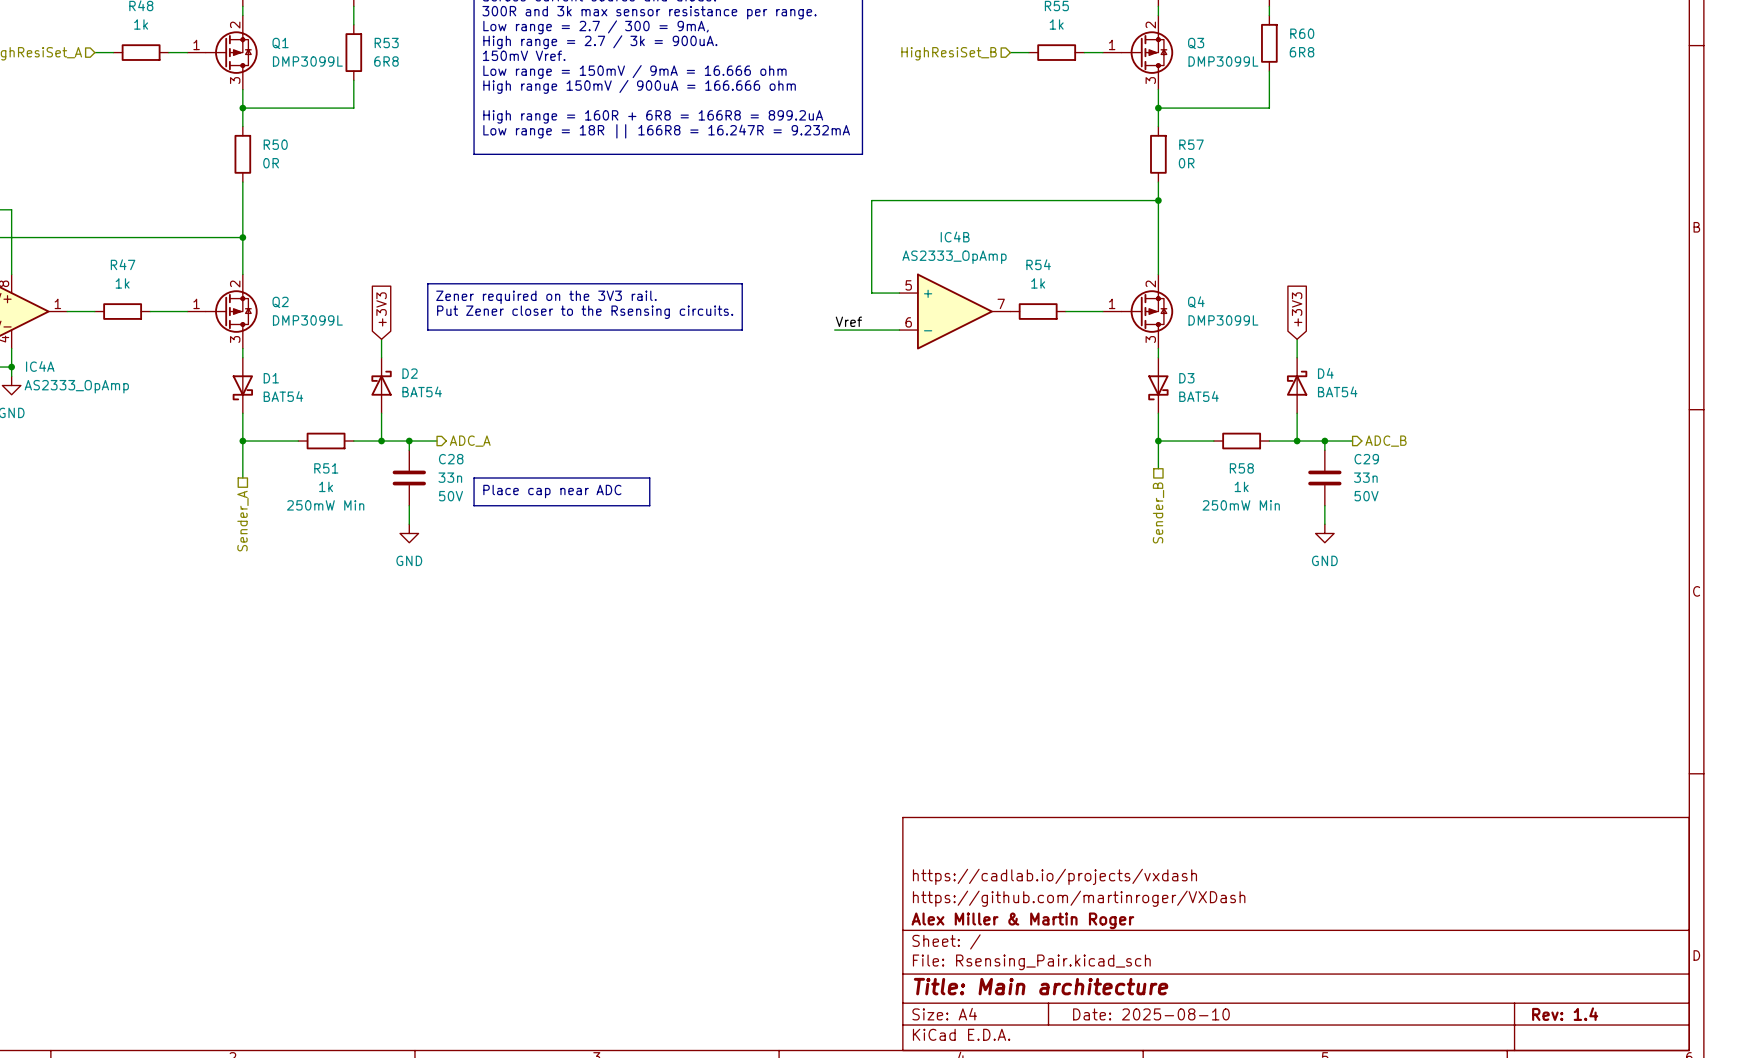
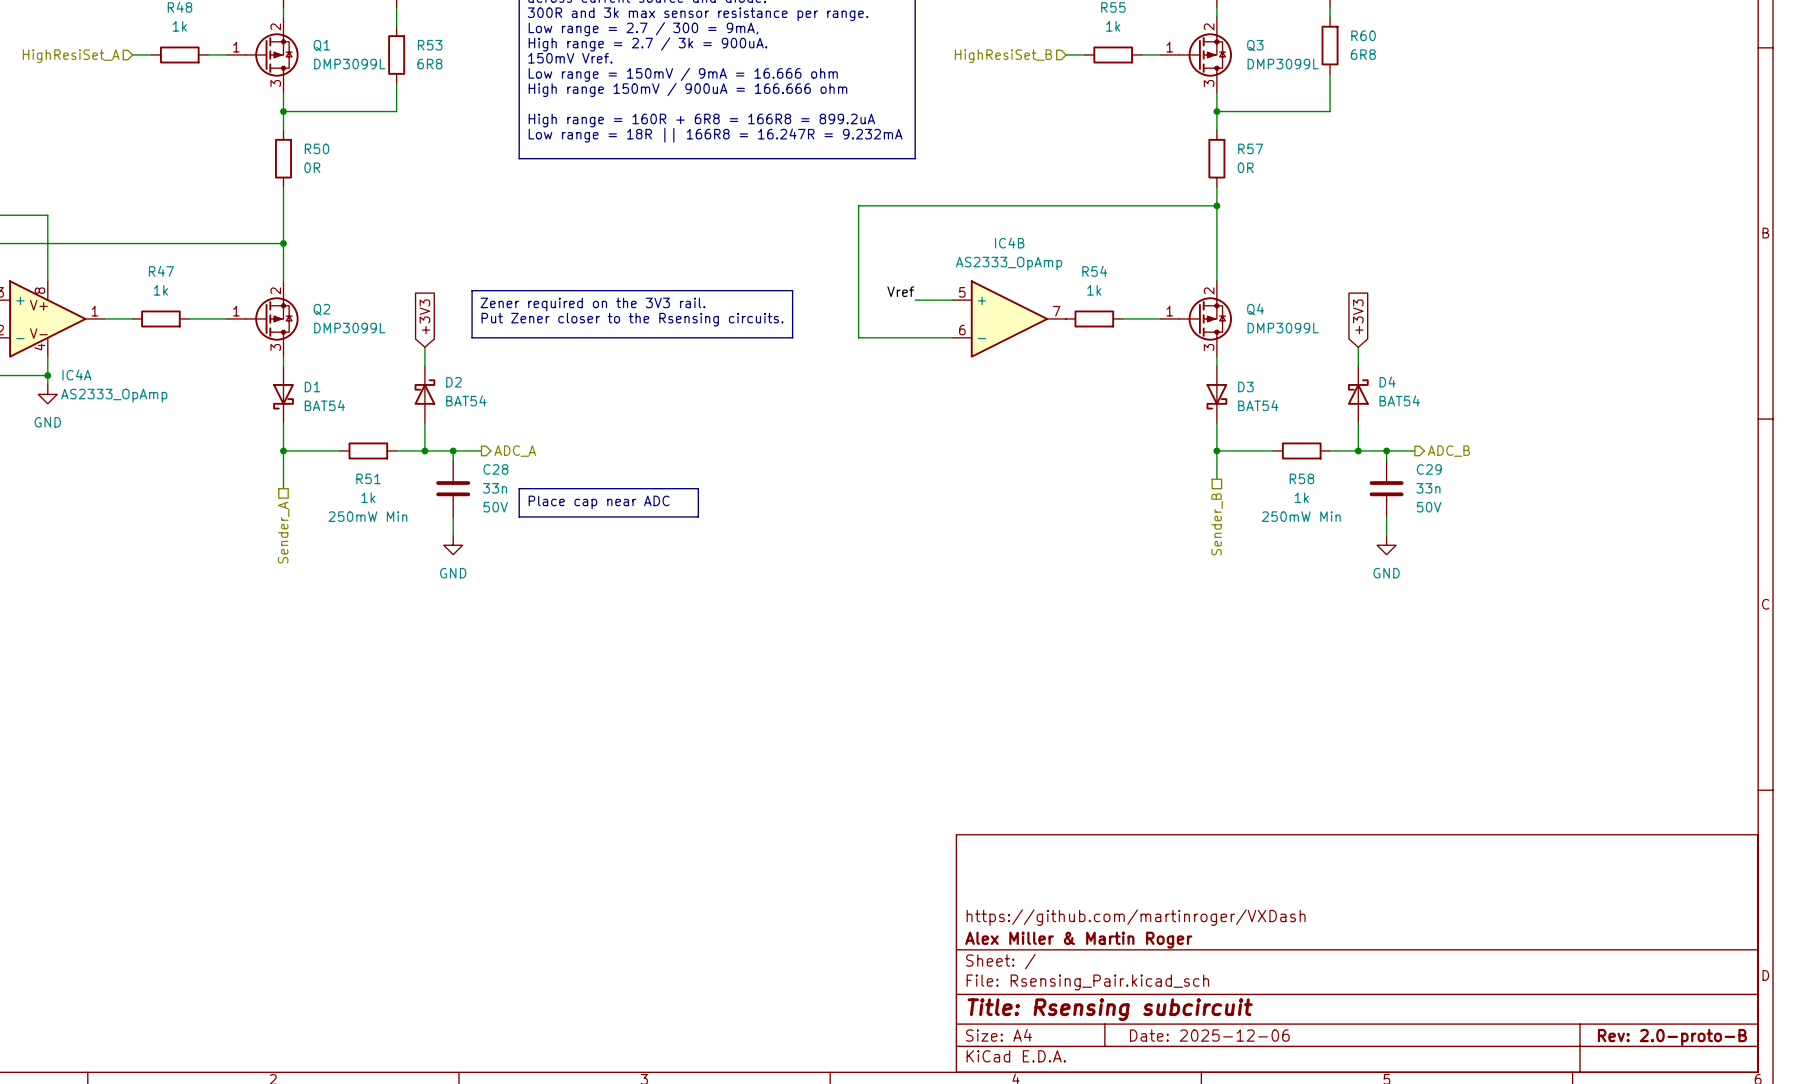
wire: (871, 200) (871, 293) -> (924, 205) (858, 205) (858, 337) (886, 337)
wire: none -> (915, 300) (924, 300)
label position: Vref (848, 321) -> Vref (900, 291)
title block: https://cadlab.io/projects/vxdash (1054, 876) -> none
title block: Title: Main architecture (1041, 986) -> Title: Rsensing subcircuit (1110, 1009)
title block: Date: 2025-08-10 (1151, 1014) -> Date: 2025-12-06 (1209, 1035)
title block: Rev: 1.4 (1565, 1014) -> Rev: 2.0-proto-B (1672, 1037)

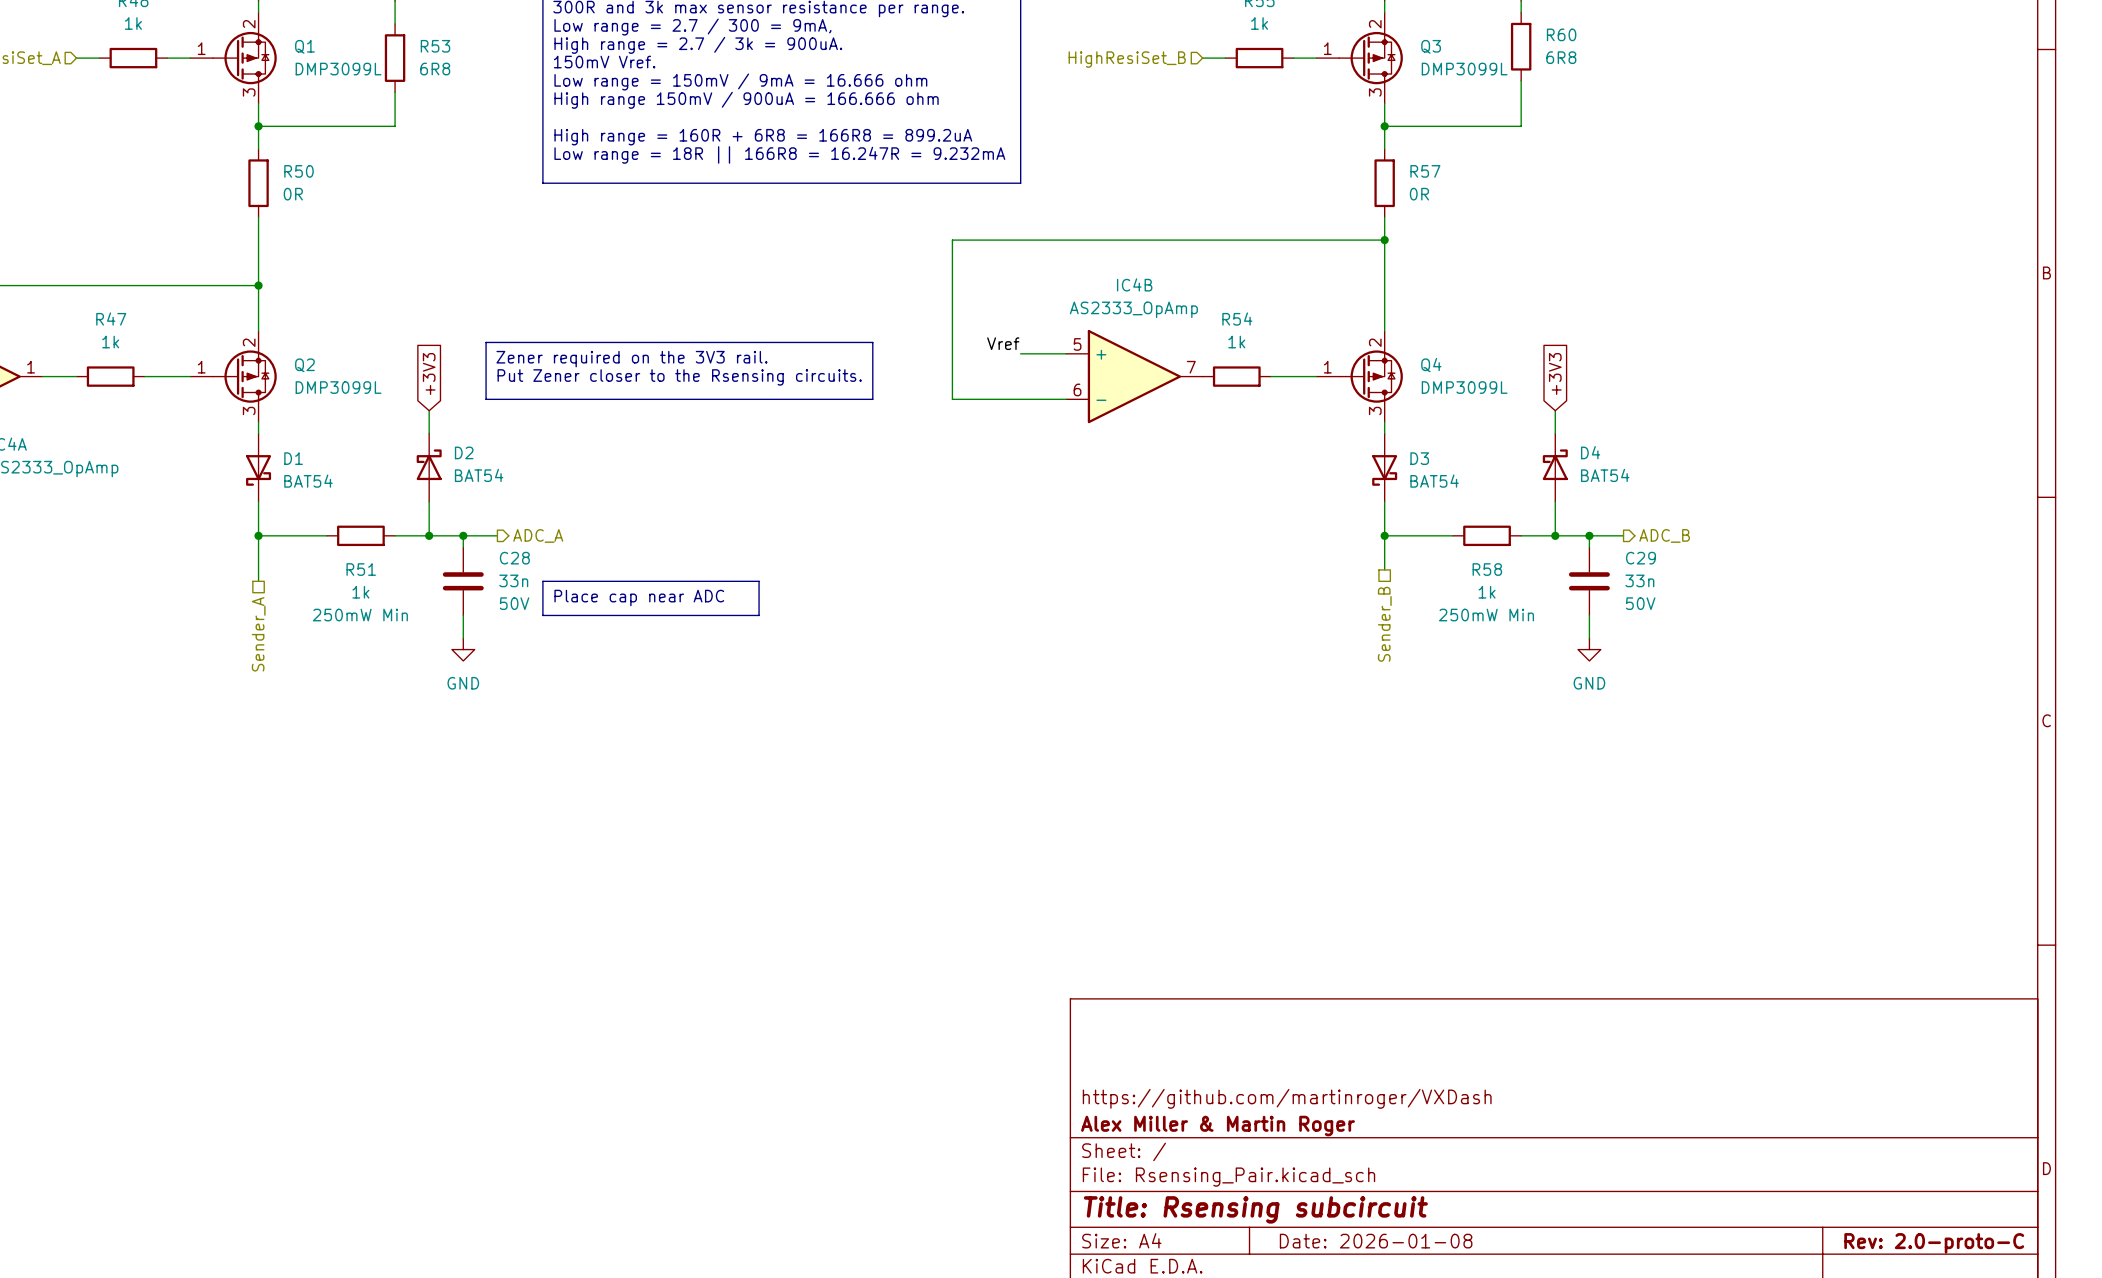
title block: Date: 2025-12-06 (1209, 1035) -> Date: 2026-01-08 (1376, 1241)
title block: Rev: 2.0-proto-B (1672, 1037) -> Rev: 2.0-proto-C (1934, 1243)

